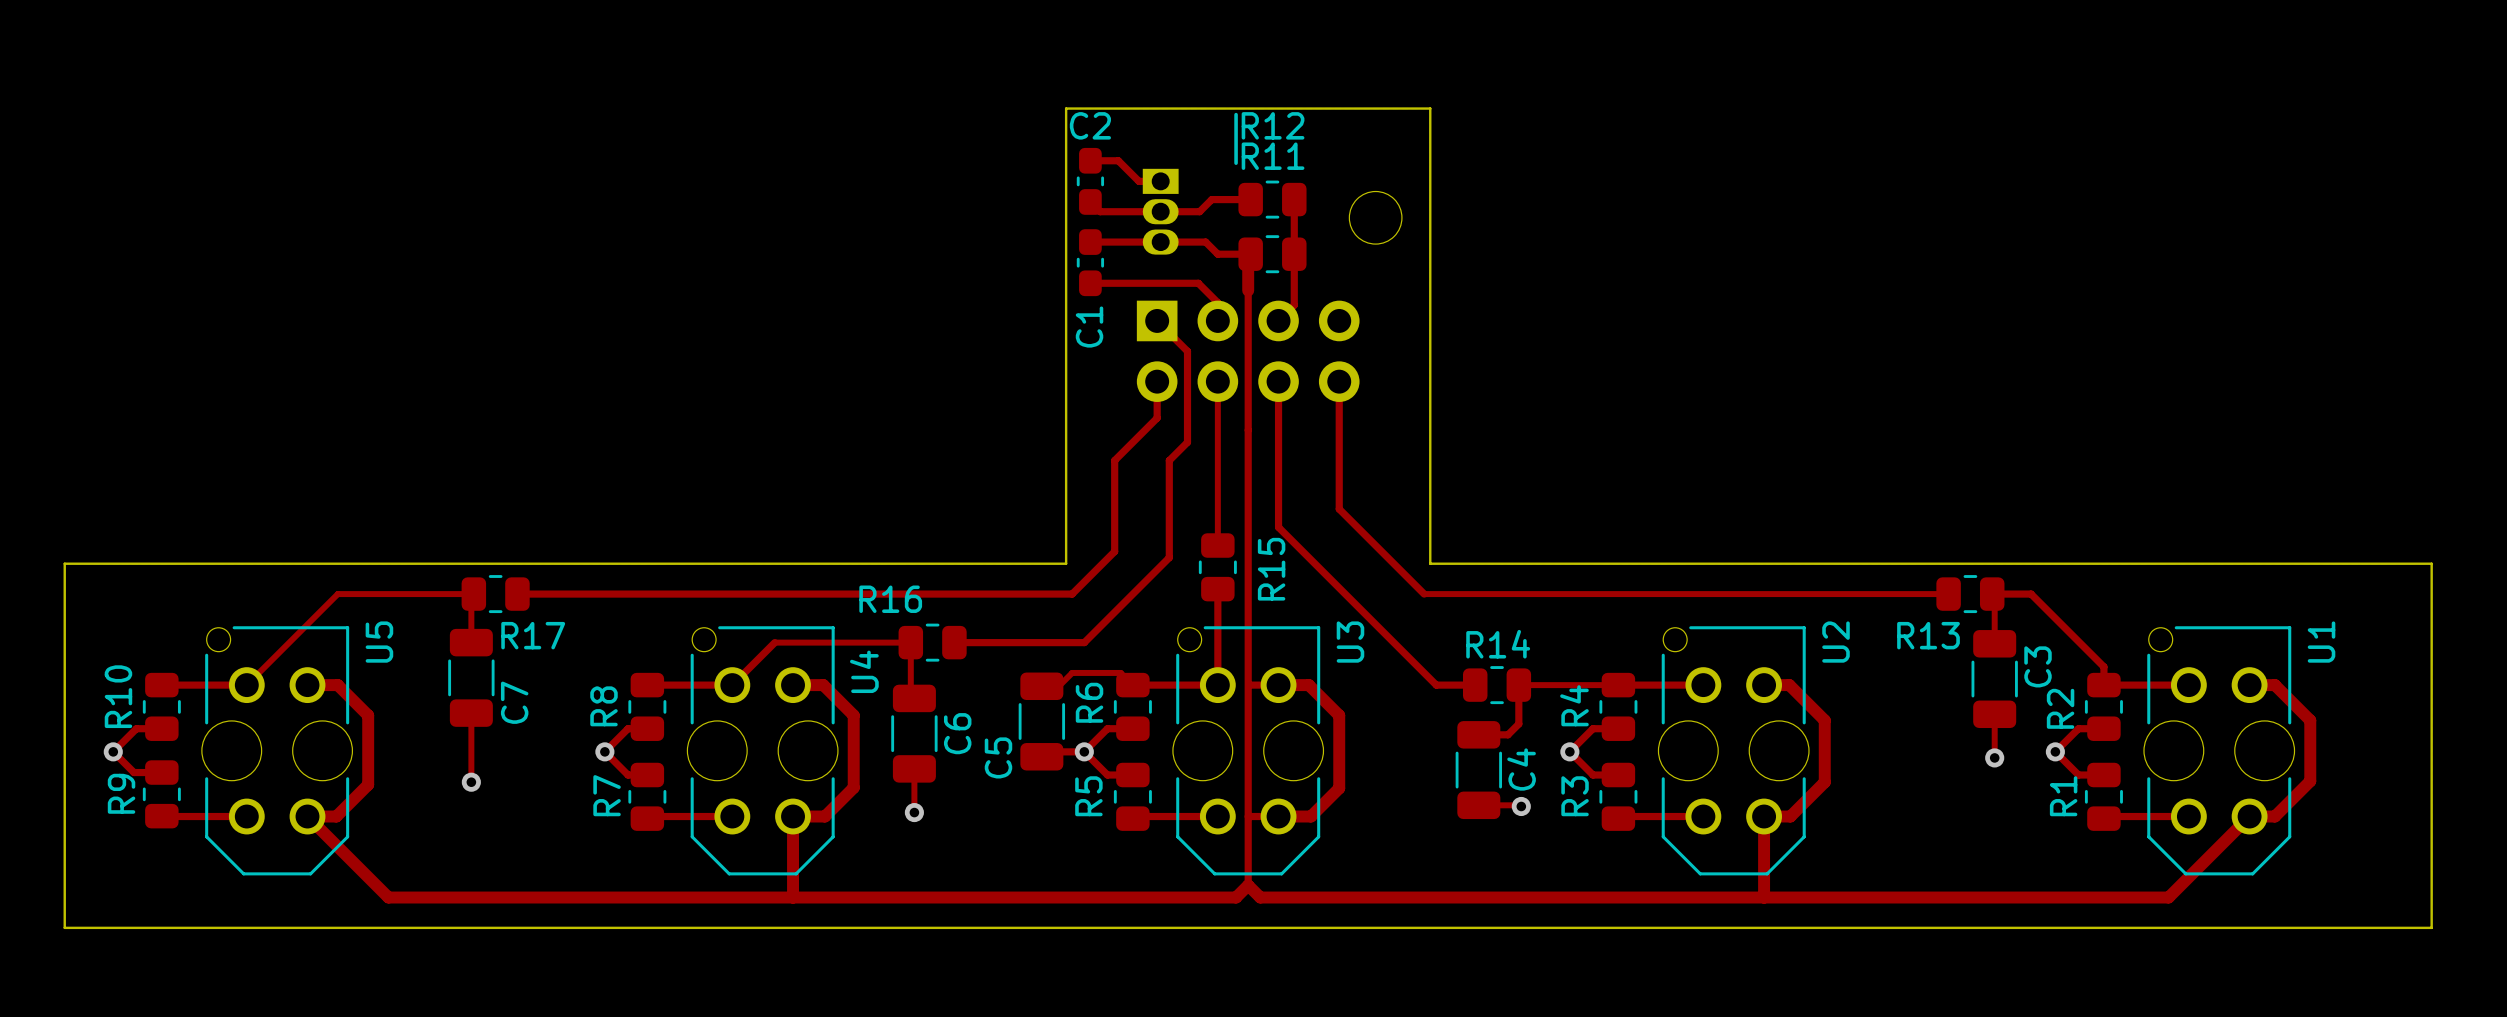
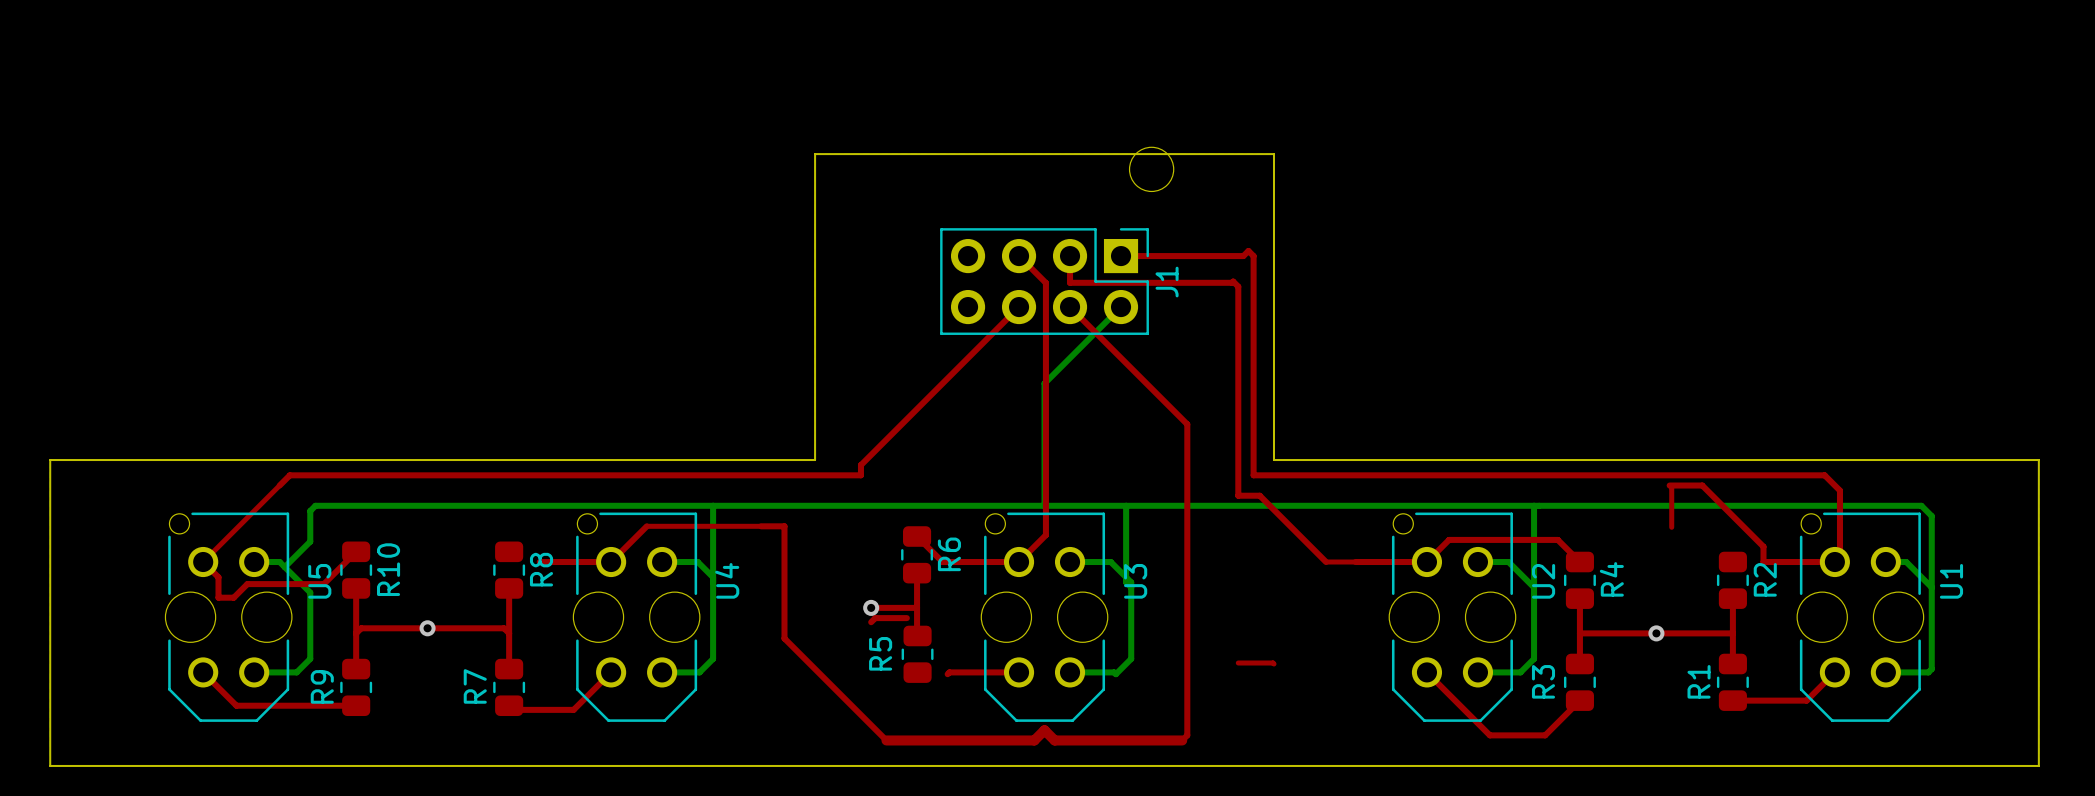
line: (1236, 114) (1236, 163) -> none
top track: (1090, 160) (1118, 160) (1138, 181) (1160, 181) -> none
C2: (1090, 181) -> none
top track: (1250, 199) (1211, 199) (1199, 211) (1100, 211) (1090, 201) -> none
R12: (1272, 199) -> none
top track: (1294, 199) (1294, 305) (1278, 320) -> none
part: (1160, 211) -> none
top track: (1090, 242) (1205, 242) (1217, 254) (1250, 254) (1248, 256) (1248, 885) -> none
R11: (1272, 254) -> none
C1: (1090, 262) -> none
top track: (1090, 283) (1198, 283) (1217, 302) (1217, 320) -> none
top track: (1157, 320) (1187, 351) (1187, 442) (1169, 460) (1169, 557) (1084, 642) (954, 642) -> none
top track: none -> (1121, 256) (1243, 256) (1248, 250) (1253, 256) (1253, 475) (1824, 475) (1839, 490) (1839, 556) (1834, 562)
J1 side: bottom (1248, 351) -> top (1044, 281)
top track: (1157, 381) (1157, 418) (1114, 460) (1114, 551) (1072, 594) (517, 594) -> none
top track: (1217, 381) (1217, 545) -> none
top track: (1278, 381) (1278, 527) (1436, 685) (1475, 685) -> none
top track: (1339, 381) (1339, 509) (1424, 594) (1948, 594) -> none
bottom track: none -> (1121, 307) (1044, 383) (1044, 505)
board edge: (975, 563) (1066, 563) (1066, 108) (1430, 108) (1430, 563) (1521, 563) -> (815, 460) (815, 154) (1273, 154) (1273, 460)
R15: (1217, 567) -> none
top track: (1217, 589) (1217, 685) -> (1019, 256) (1045, 282) (1045, 535) (1019, 562)
top track: (337, 594) (473, 594) (471, 596) (471, 642) -> (279, 485) (289, 475) (860, 475) (860, 465) (1019, 307)
R17: (495, 594) -> none
R13: (1970, 594) -> none
bottom track: none -> (713, 505) (713, 658) (699, 672) (662, 672)
bottom track: none -> (1126, 505) (1126, 582) (1131, 587)
bottom track: none -> (1534, 505) (1534, 658) (1520, 672) (1477, 672)
U5 name position: U5 (379, 642) -> U5 (319, 581)
top track: (910, 642) (910, 694) (914, 698) -> (761, 526) (784, 526) (784, 638) (886, 740)
R16: (932, 642) -> none
U3 name position: U3 (1350, 642) -> U3 (1135, 581)
U2 name position: U2 (1836, 642) -> U2 (1543, 581)
U1 name position: U1 (2321, 642) -> U1 (1951, 581)
U4 name position: U4 (864, 671) -> U4 (727, 580)
C7: (471, 677) -> none
C3: (1994, 679) -> none
top track: (161, 685) (246, 685) -> (356, 551) (323, 584) (247, 584) (233, 597) (218, 597) (218, 577) (203, 562)
top track: (307, 685) (337, 685) (368, 715) (368, 784) (336, 816) (307, 816) (388, 897) (1060, 897) -> none
bottom track: none -> (254, 562) (279, 562) (310, 592) (310, 658) (296, 672) (254, 672)
top track: (793, 685) (823, 685) (853, 715) (853, 787) (824, 816) (793, 816) (793, 897) -> none
bottom track: none -> (662, 562) (697, 562) (713, 577)
top track: (1132, 685) (1120, 672) (1072, 672) (1058, 686) (1041, 686) -> (947, 562) (942, 562) (917, 536)
top track: (1249, 685) (1308, 685) (1339, 715) (1339, 788) (1310, 816) (1248, 816) -> none
bottom track: none -> (1070, 562) (1110, 562) (1131, 582) (1131, 658) (1115, 674) (1114, 672) (1070, 672)
R14: (1497, 685) -> none
top track: (1583, 685) (1518, 685) (1518, 723) (1508, 734) (1478, 734) -> (1326, 562) (1259, 495) (1238, 495) (1238, 286) (1233, 281) (1070, 282) (1070, 256)
top track: none -> (1426, 562) (1449, 539) (1557, 539) (1579, 562)
top track: (1764, 685) (1789, 685) (1824, 720) (1824, 782) (1790, 816) (1764, 816) (1764, 897) -> none
bottom track: none -> (1477, 562) (1508, 562) (1534, 587)
top track: (2249, 685) (2274, 685) (2310, 720) (2310, 781) (2274, 816) (2249, 816) (2168, 897) (1412, 897) -> (1070, 292) (1070, 307) (1187, 424) (1187, 735) (1182, 740)
bottom track: none -> (1885, 562) (1906, 562) (1931, 587)
bottom track: none -> (284, 567) (310, 541) (310, 511) (315, 505) (1921, 505) (1931, 516) (1931, 669) (1928, 672) (1885, 672)
R10 name position: R10 (118, 696) -> R10 (388, 569)
top track: none -> (917, 573) (917, 635)
R6 name position: R6 (1089, 702) -> R6 (949, 554)
R4 name position: R4 (1574, 705) -> R4 (1611, 579)
R10 position: (161, 706) -> (356, 570)
R8 name position: R8 (603, 706) -> R8 (541, 569)
R8 position: (647, 706) -> (509, 570)
R6 position: (1132, 706) -> (917, 554)
R4 position: (1618, 706) -> (1579, 580)
R2 position: (2103, 706) -> (1732, 580)
R2 name position: R2 (2060, 708) -> R2 (1765, 579)
top track: (1994, 714) (1994, 757) -> none
top track: none -> (356, 588) (356, 669)
top track: (471, 720) (471, 782) -> none
C5: (1041, 721) -> none
top track: (161, 728) (136, 728) (113, 751) (133, 772) (161, 772) -> none
top track: none -> (509, 598) (509, 669)
top track: (647, 728) (628, 728) (604, 751) (628, 775) (647, 775) -> none
top track: (1132, 728) (1107, 728) (1084, 751) (1107, 775) (1132, 775) -> none
top track: (1618, 728) (1593, 728) (1569, 751) (1593, 775) (1618, 775) -> none
top track: none -> (1579, 598) (1579, 663)
top track: none -> (1732, 598) (1732, 663)
top track: (2103, 728) (2078, 728) (2055, 751) (2078, 775) (2103, 775) -> none
C6: (914, 733) -> none
top track: none -> (871, 607) (917, 607)
via: (113, 751) -> none
via: (604, 751) -> none
via position: (1084, 751) -> (871, 607)
via: (1569, 751) -> none
via: (2055, 751) -> none
via position: (1994, 757) -> (1656, 633)
via: none -> (427, 628)
top track: (914, 768) (914, 812) -> none
top track: none -> (356, 633) (361, 628) (504, 628) (509, 633)
C4: (1478, 770) -> none
top track: none -> (1579, 633) (1732, 633)
via: (471, 782) -> none
R9 position: (161, 794) -> (356, 687)
R7 position: (647, 796) -> (509, 687)
R5 position: (1132, 796) -> (917, 654)
R3 position: (1618, 796) -> (1579, 682)
R1 position: (2103, 796) -> (1732, 682)
via: (1521, 806) -> none
via: (914, 812) -> none
top track: (161, 816) (246, 816) -> (356, 705) (236, 705) (203, 672)
top track: (732, 816) (649, 816) (647, 818) -> (611, 672) (573, 709) (513, 709) (509, 705)
top track: (1703, 816) (1620, 816) (1618, 818) -> (1426, 672) (1489, 735) (1545, 735) (1579, 700)
top track: (2188, 816) (2106, 816) (2103, 818) -> (1834, 672) (1806, 700) (1732, 700)

